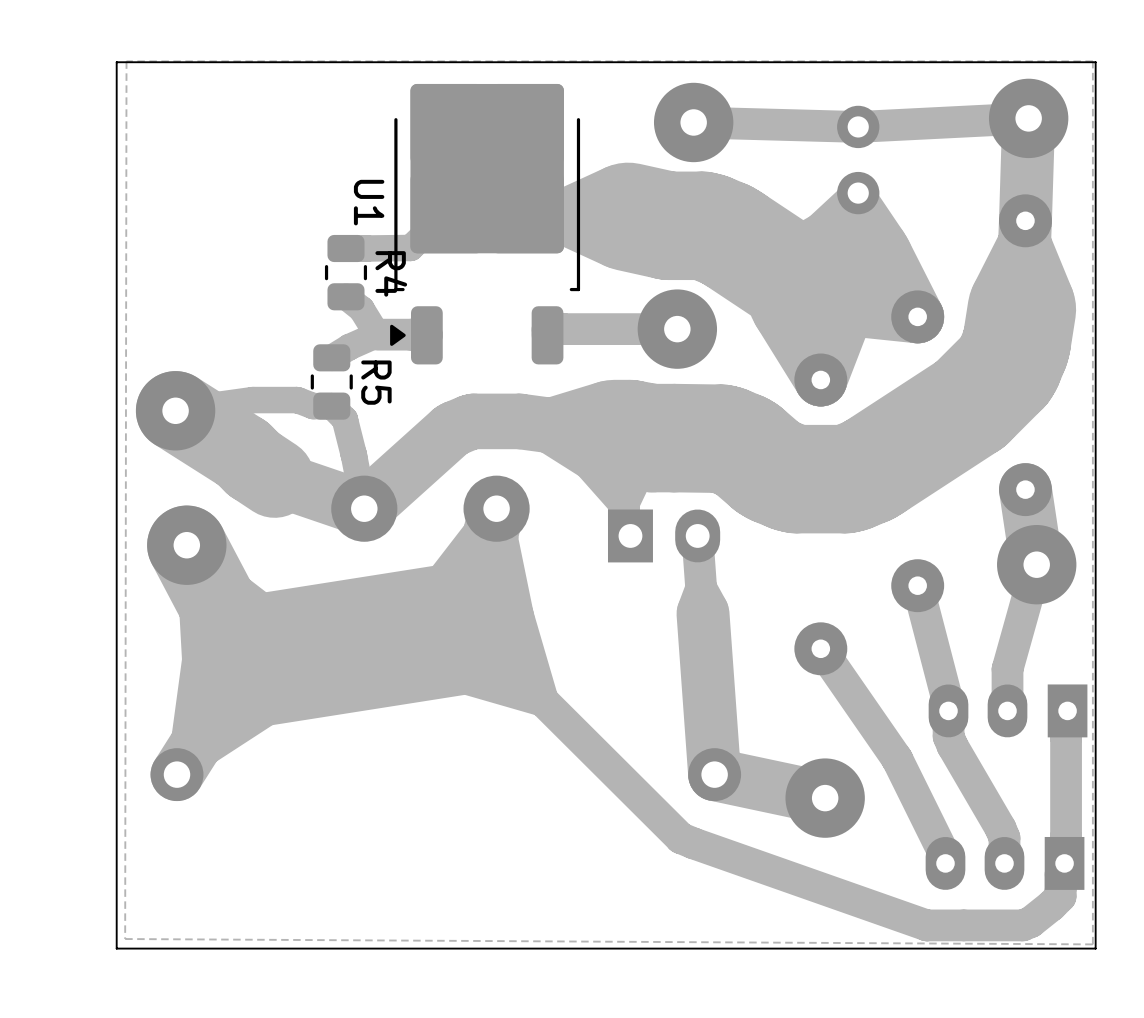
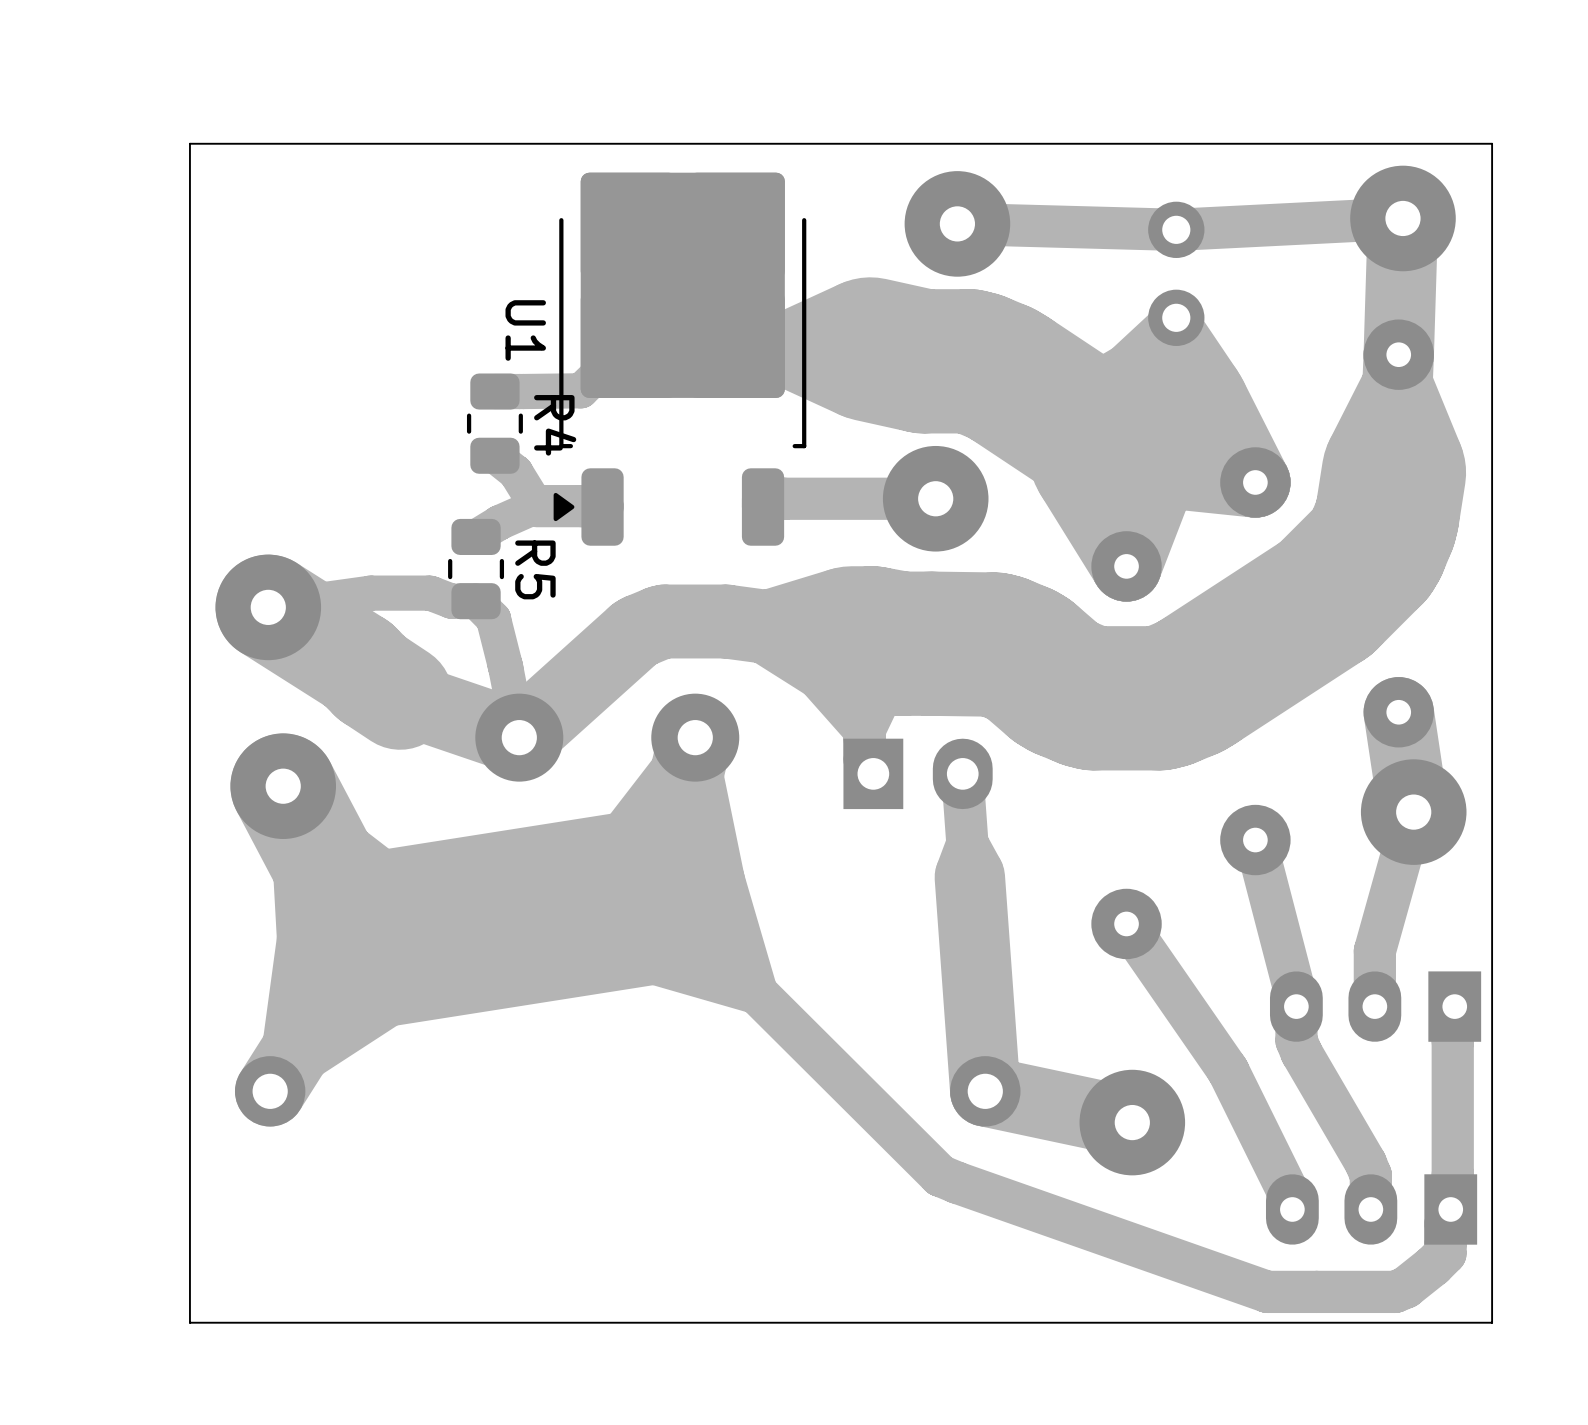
zone outline: (1092, 61) (126, 61) (125, 939) (1092, 944) (1092, 61) -> none

